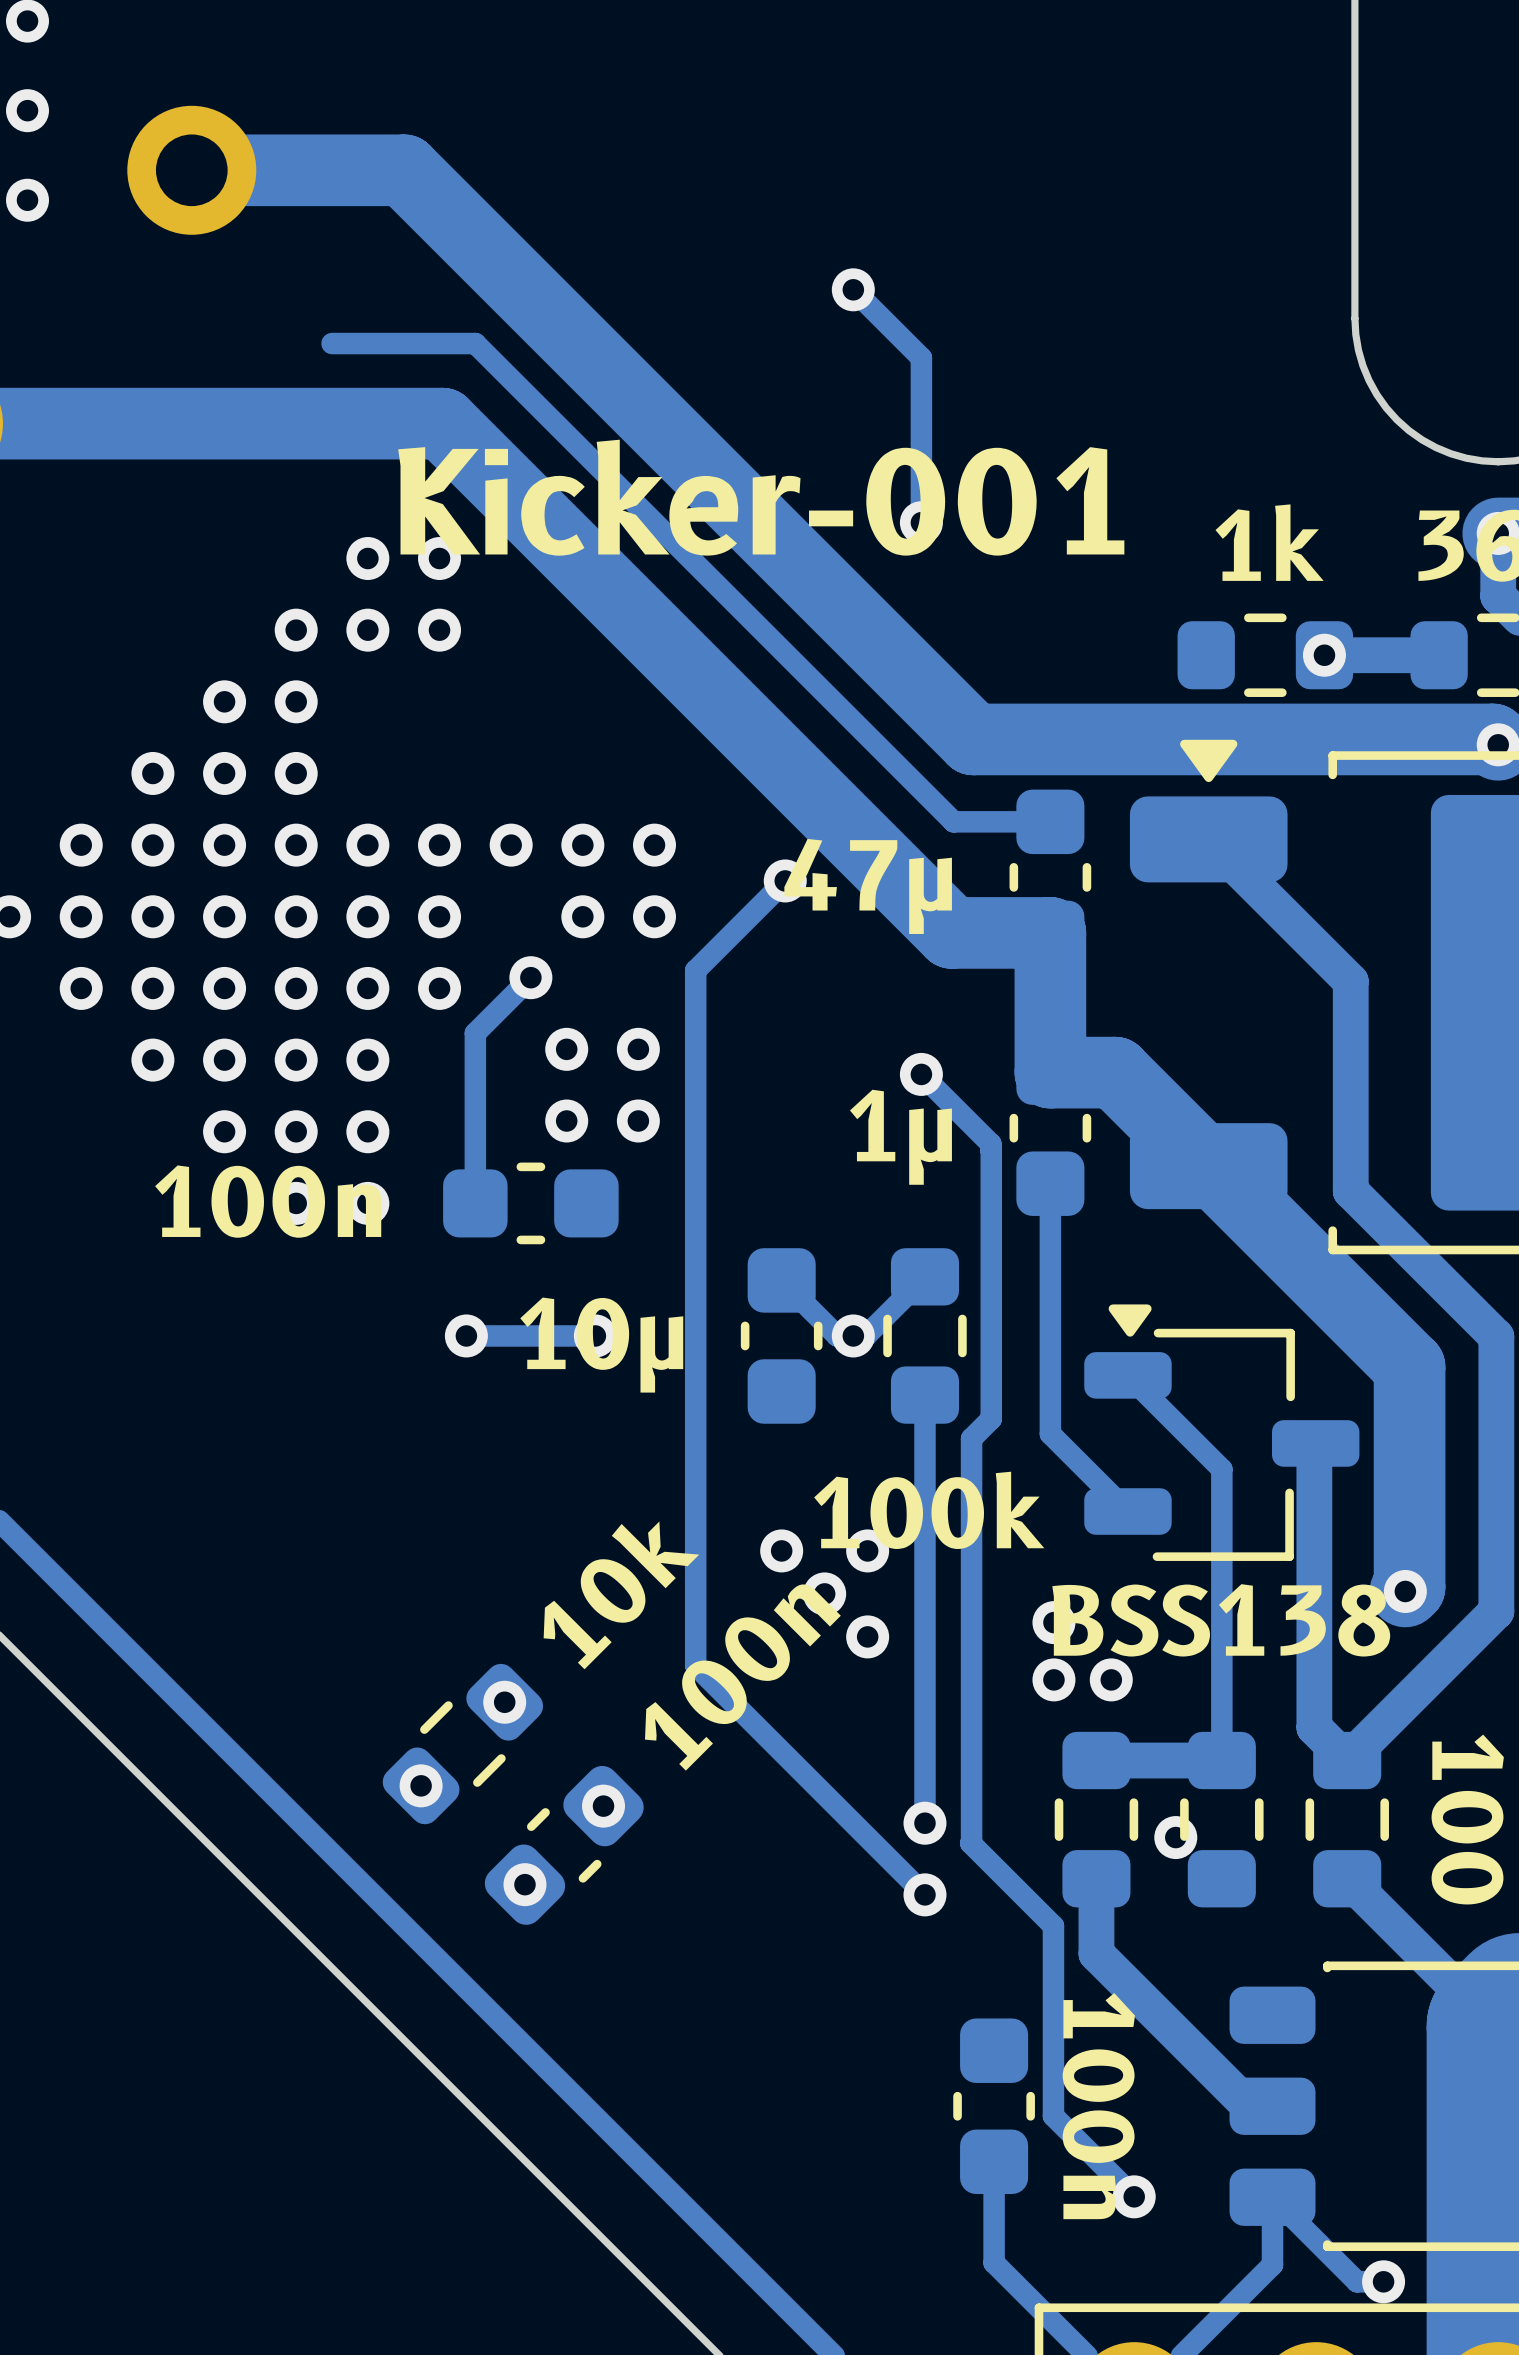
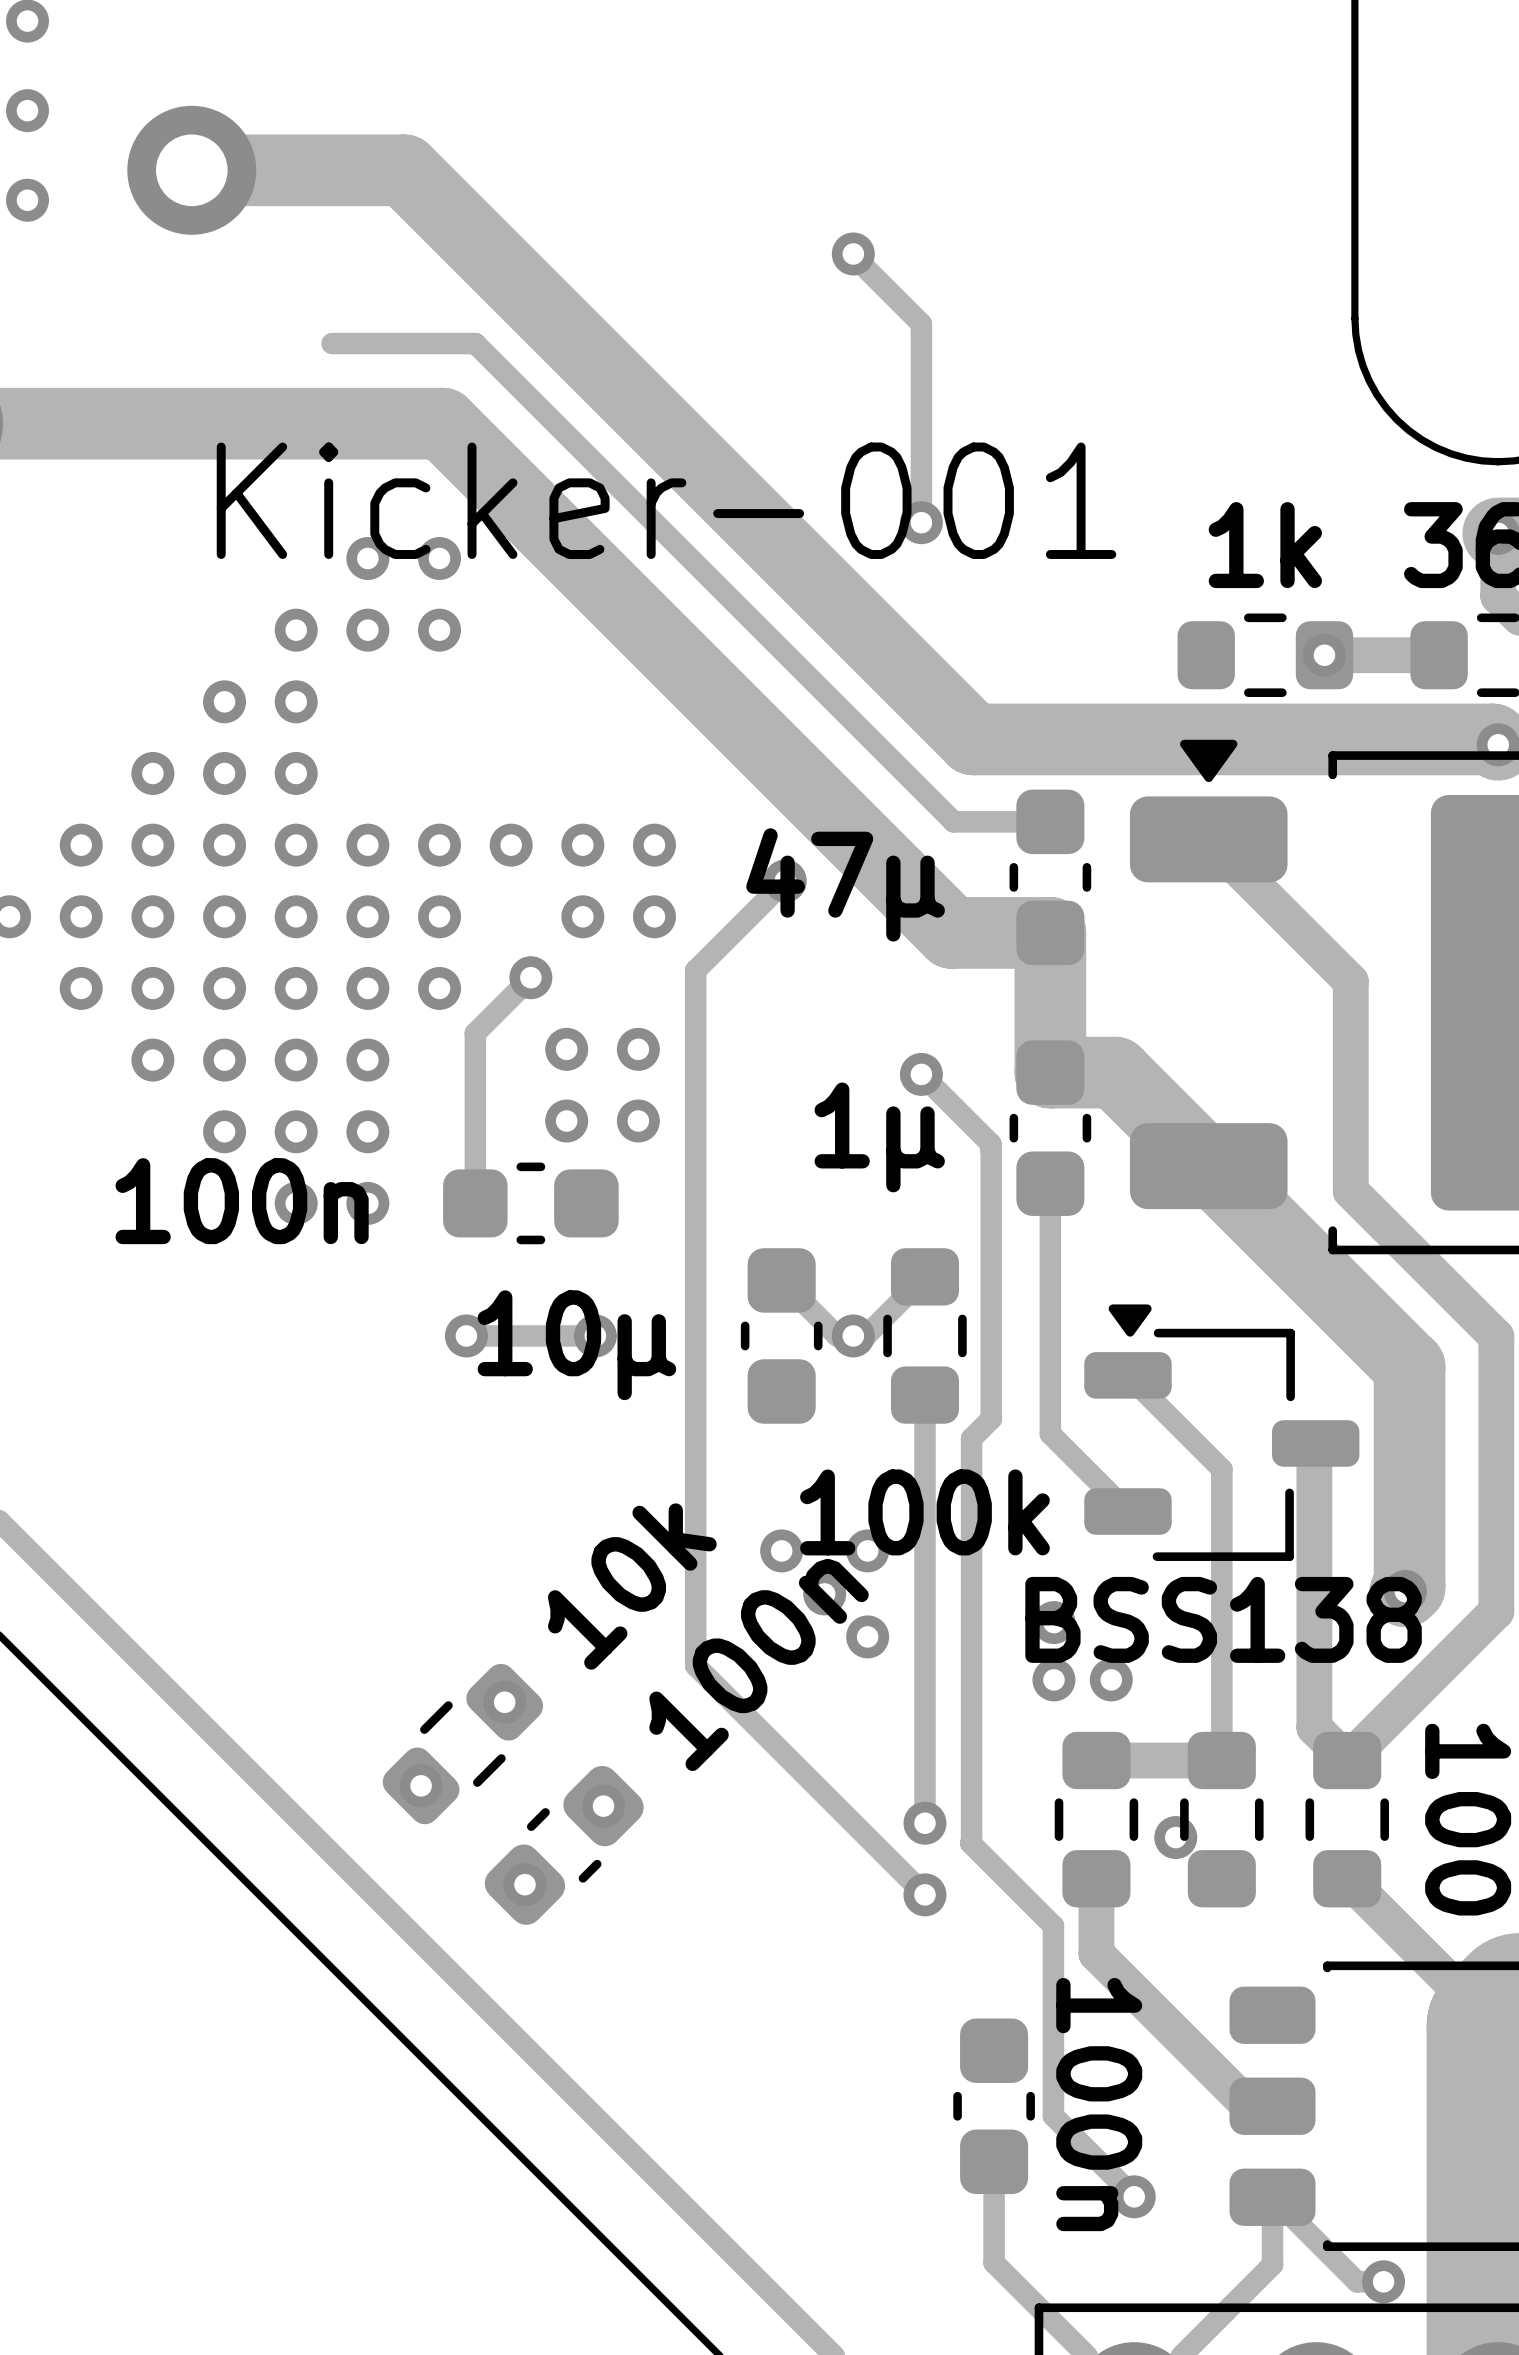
track: (853, 289) (921, 357) -> (853, 253) (921, 323) (921, 357)
via position: (853, 289) -> (853, 253)

